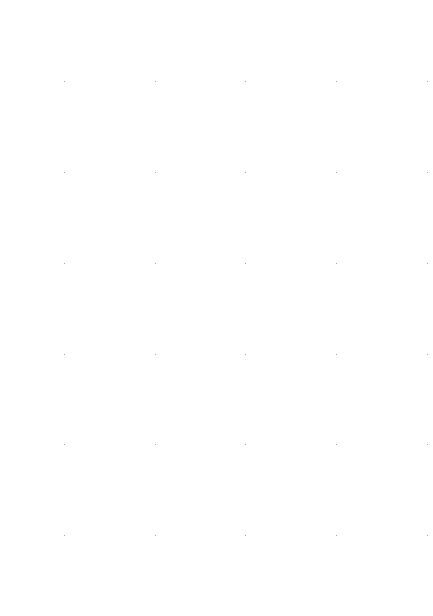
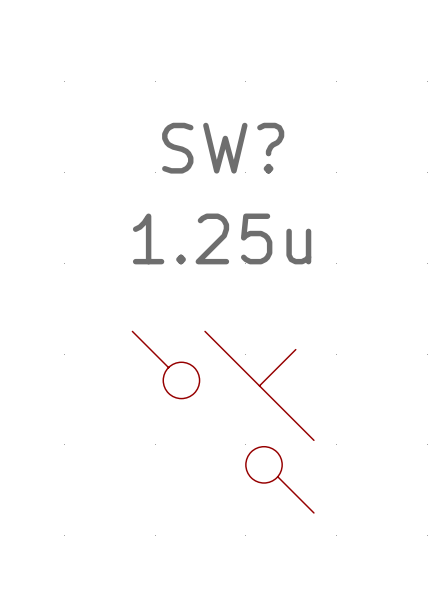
SW?: none -> 1.25u (223, 422)

